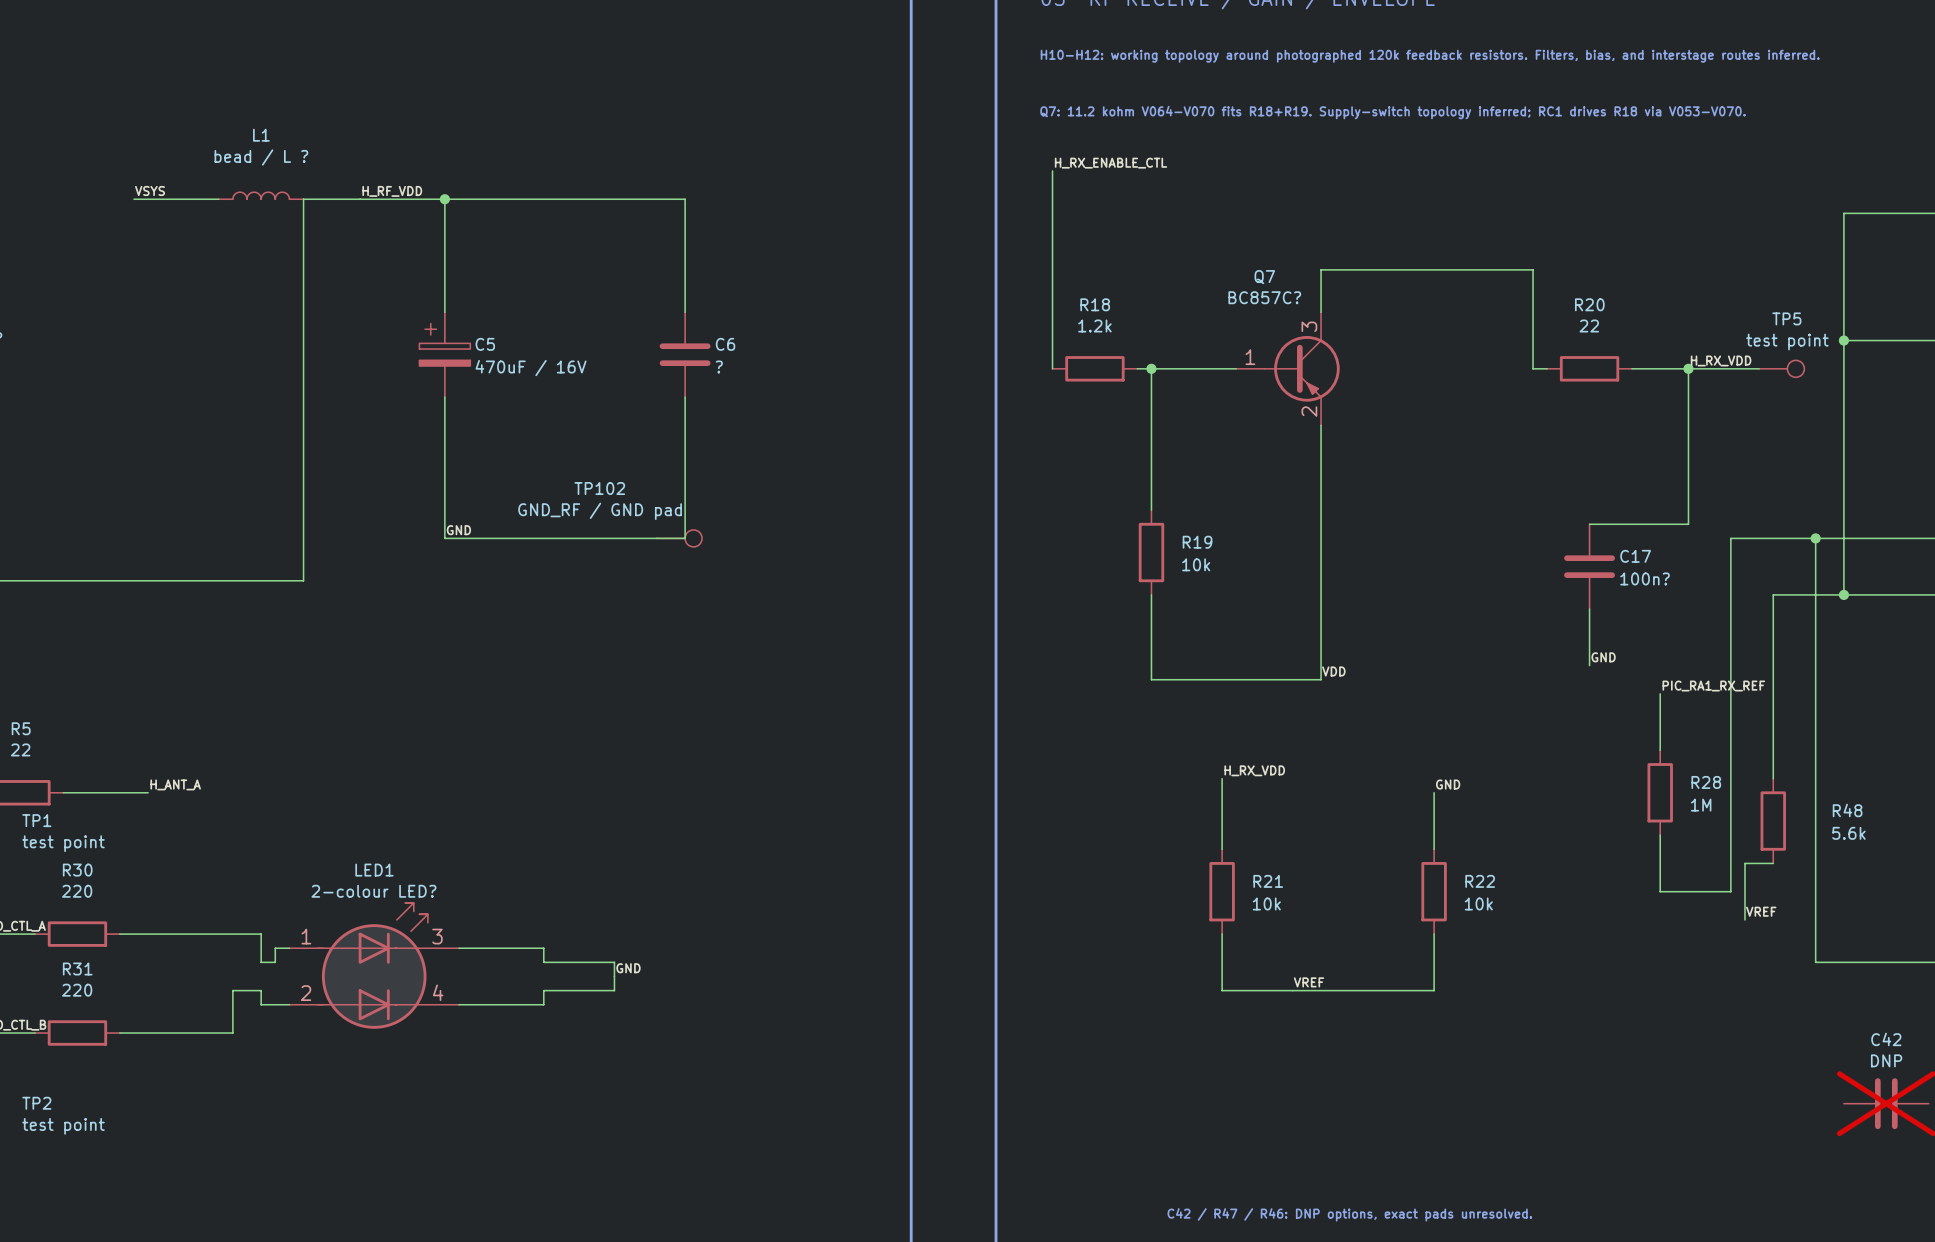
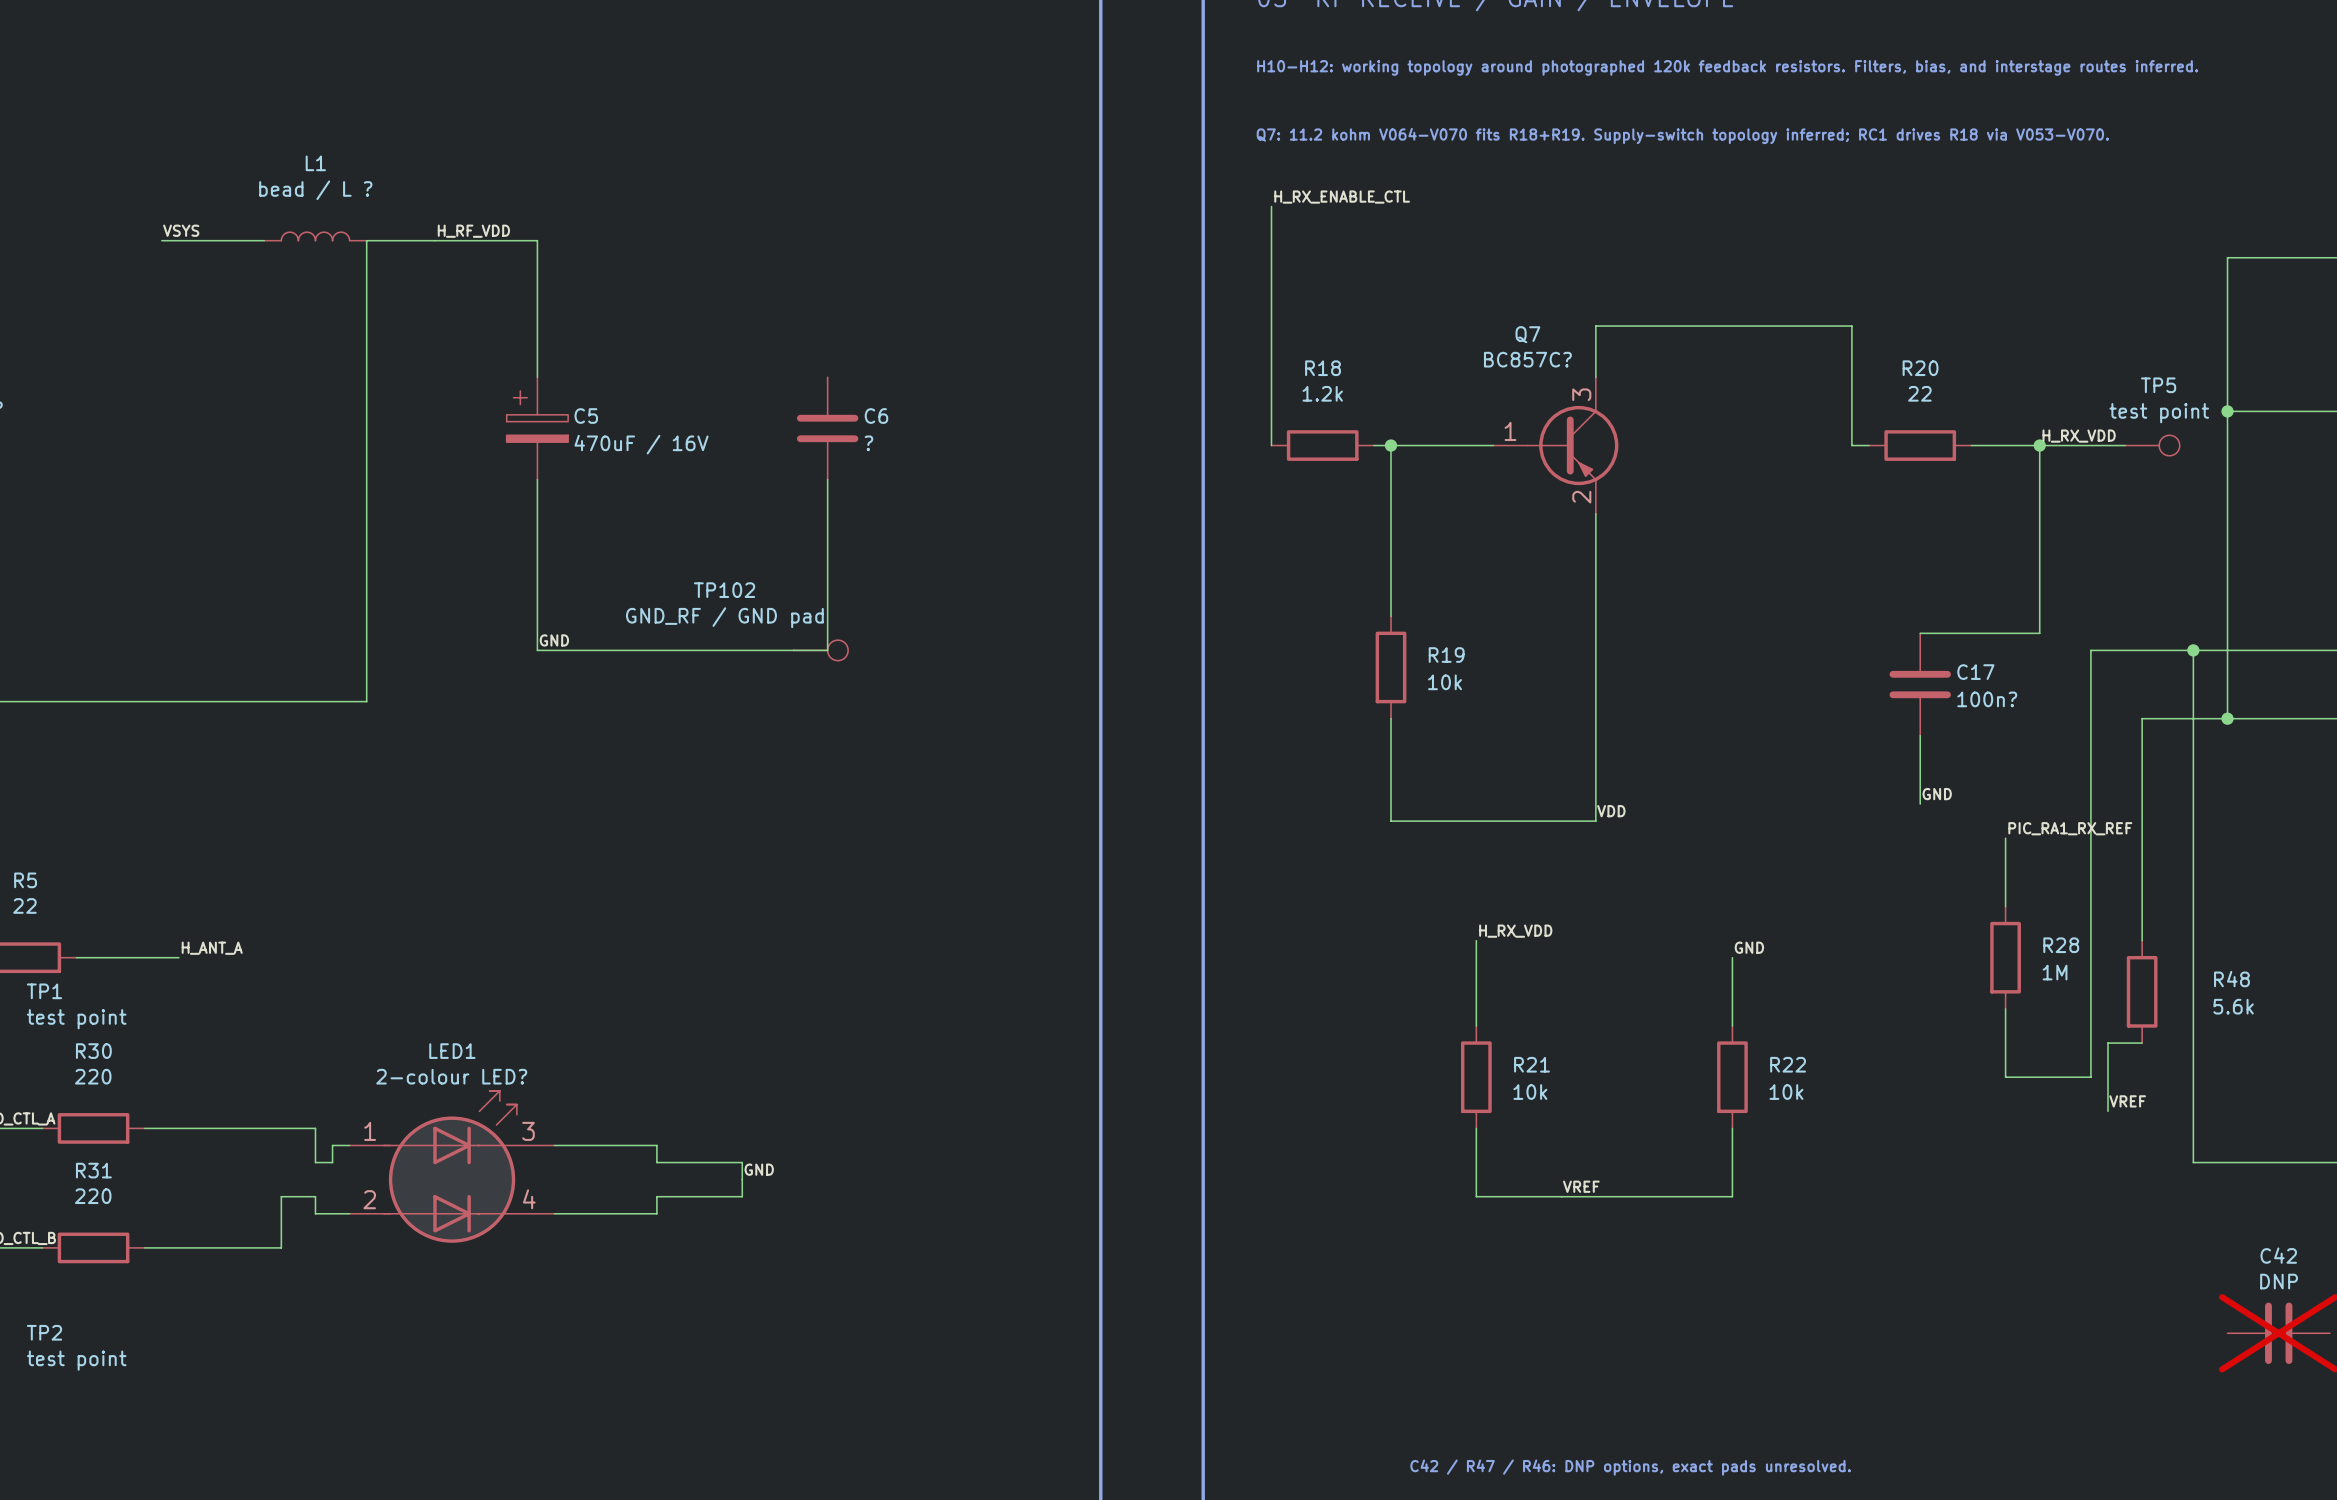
wire: (444, 199) (685, 199) (685, 312) -> none
junction: (444, 199) -> none

